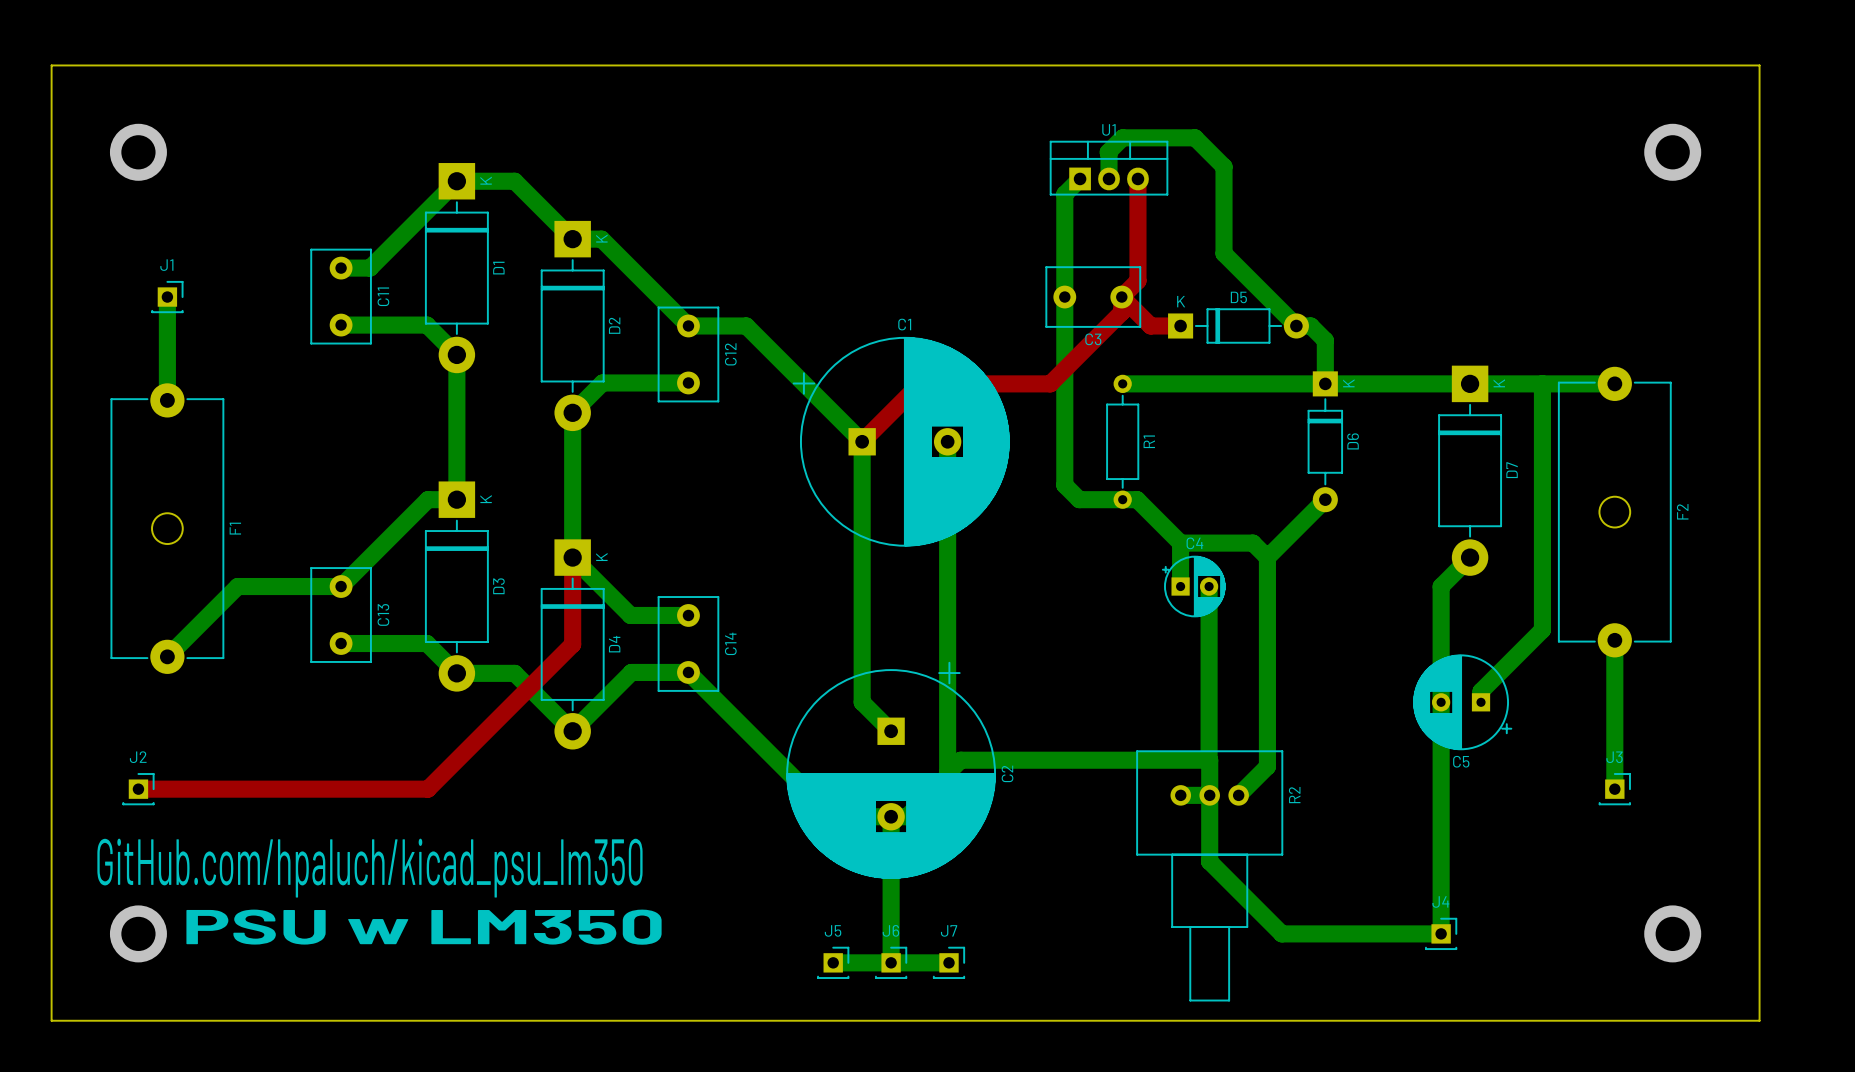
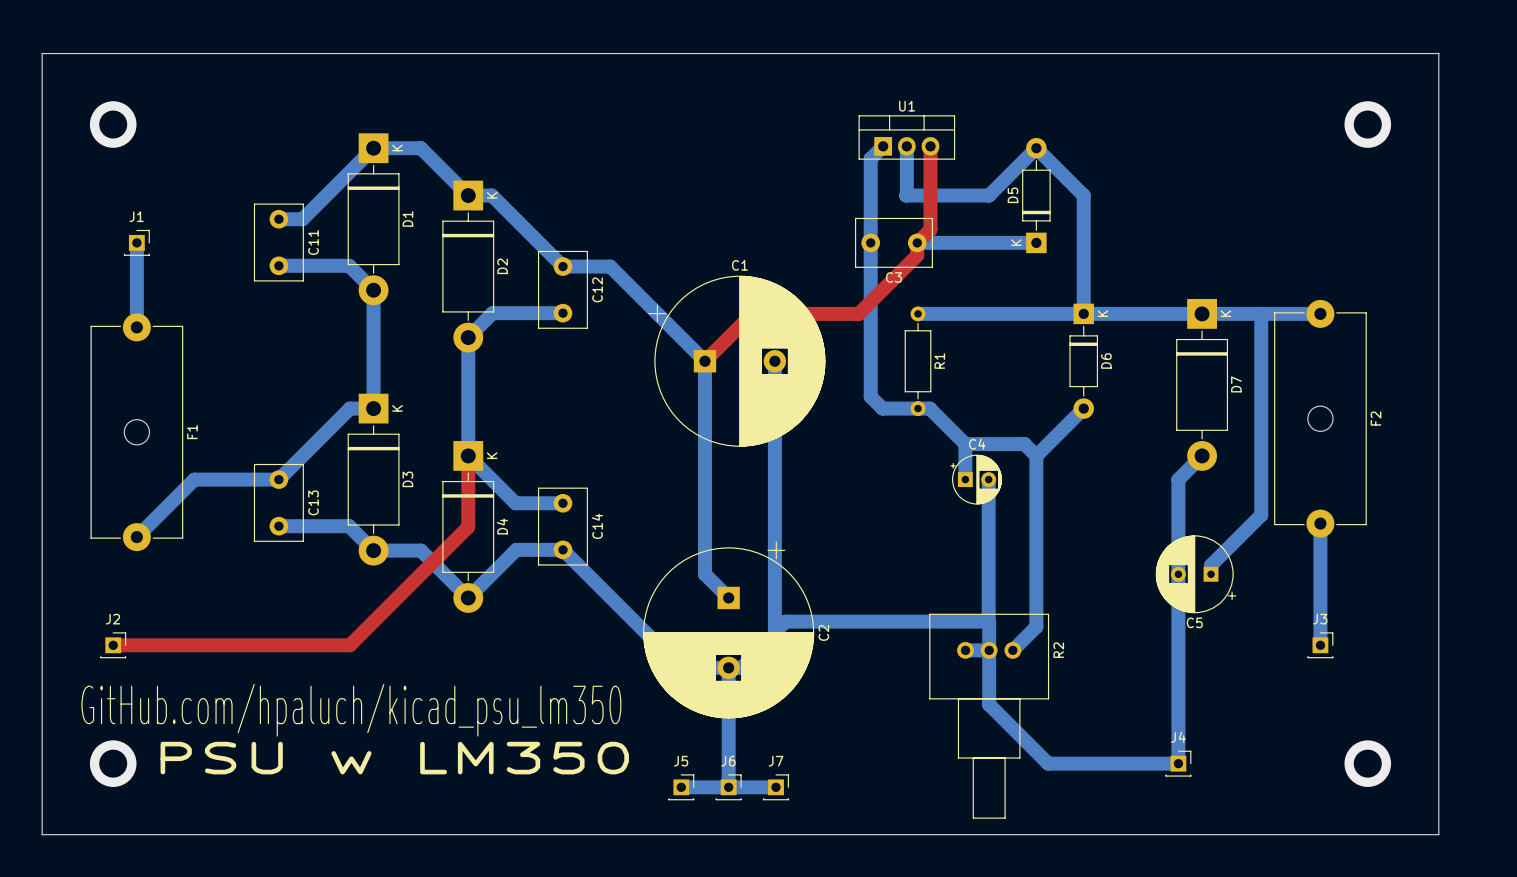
bottom track: (1109, 178) (1108, 152) (1122, 137) (1195, 137) (1224, 166) (1224, 253) (1296, 325) (1310, 325) (1325, 340) -> (906, 146) (906, 195) (989, 195) (1036, 148) (1083, 195) (1083, 278)
bottom track: none -> (917, 242) (1036, 242)
top track: (1121, 297) (1150, 325) (1180, 325) -> none
D5 rotation: 0° (1238, 325) -> 90° counterclockwise (1036, 195)
D5 position: (1238, 325) -> (1036, 195)

